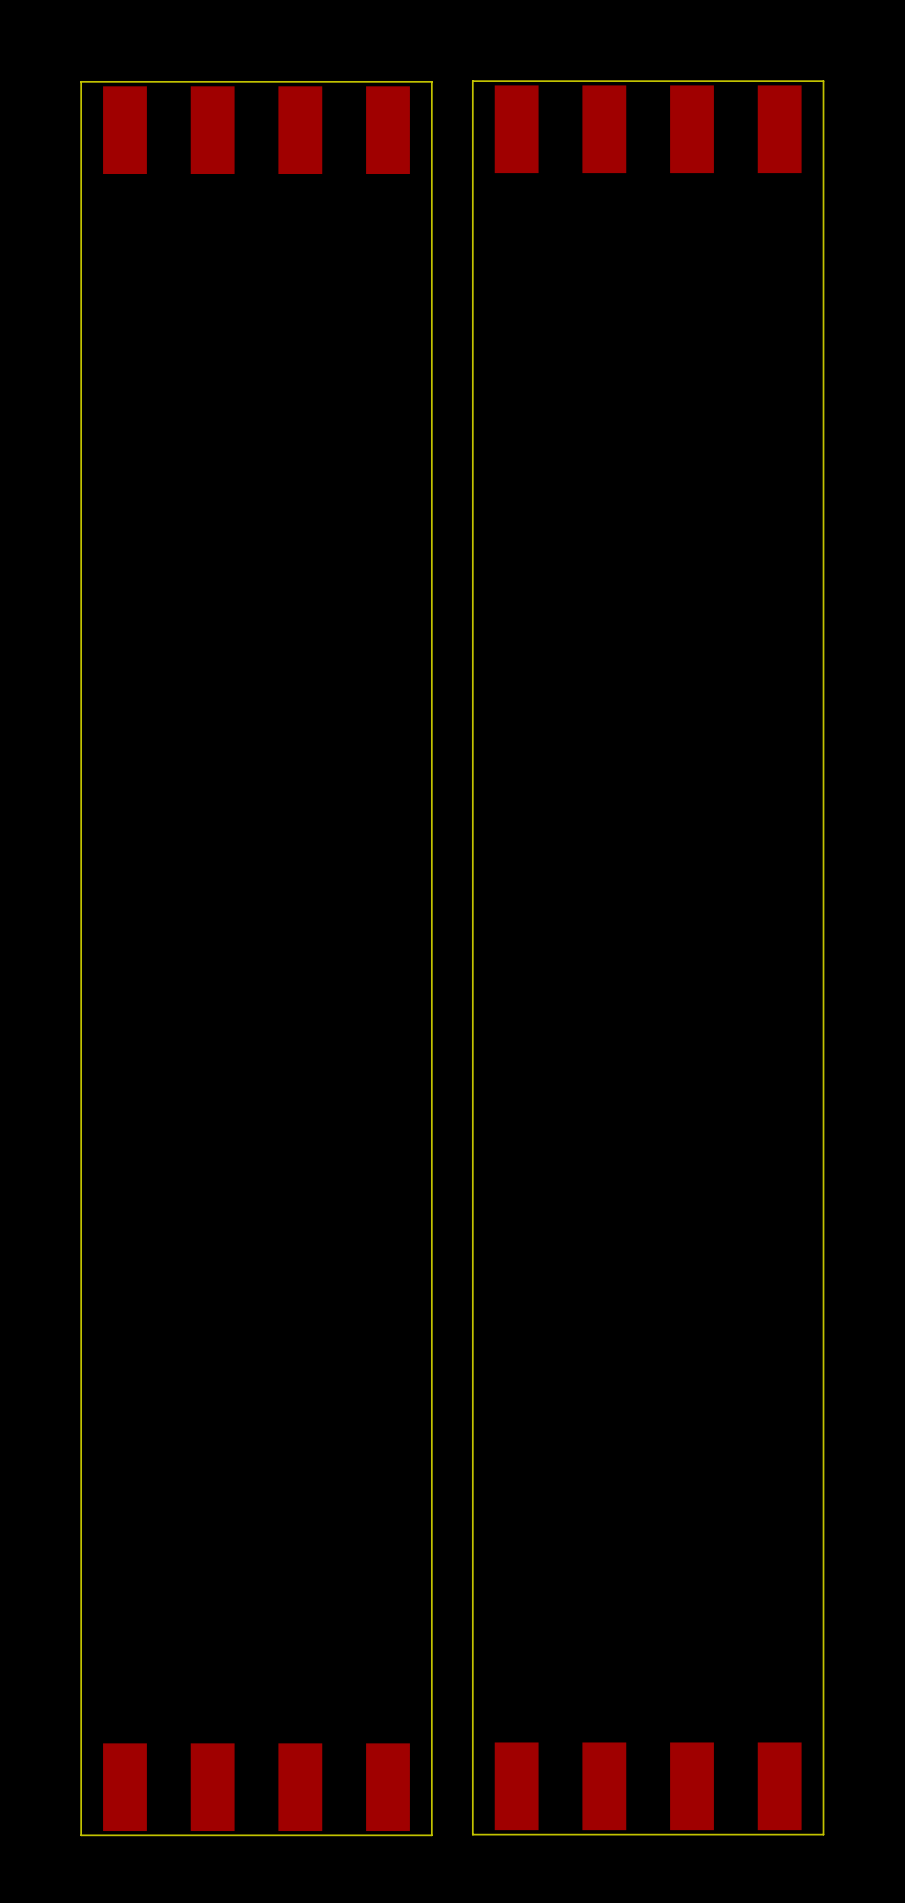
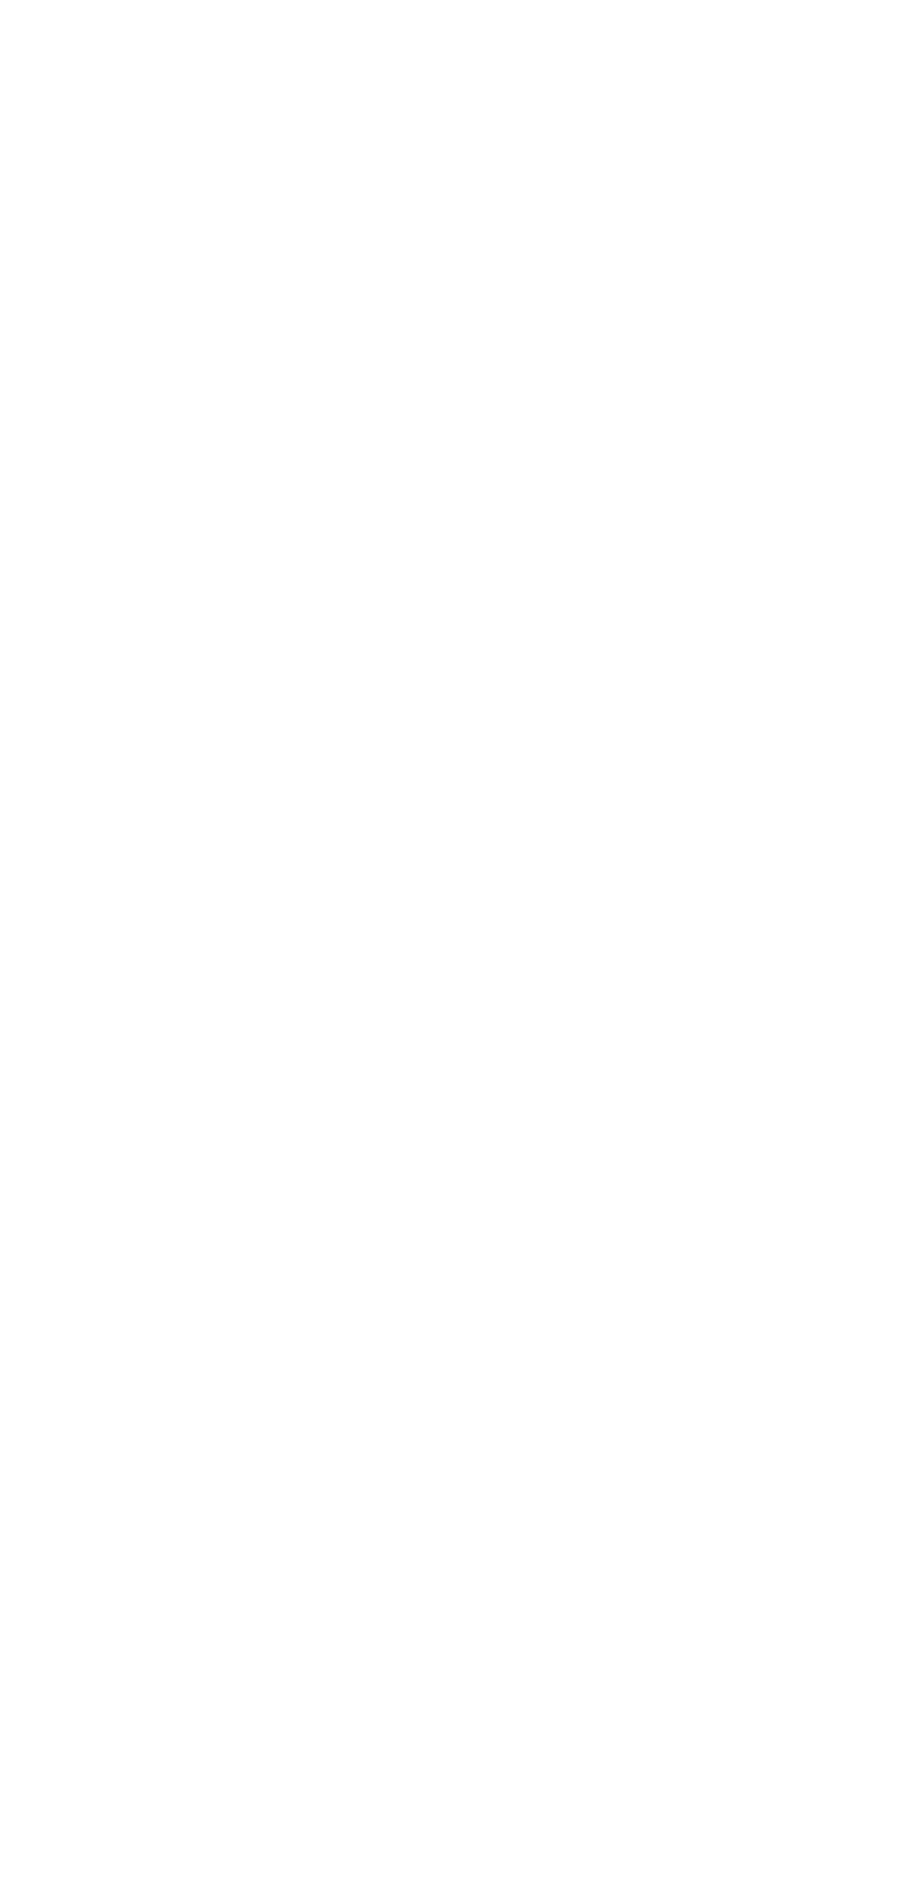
part: (648, 957) -> none
part: (256, 958) -> none

